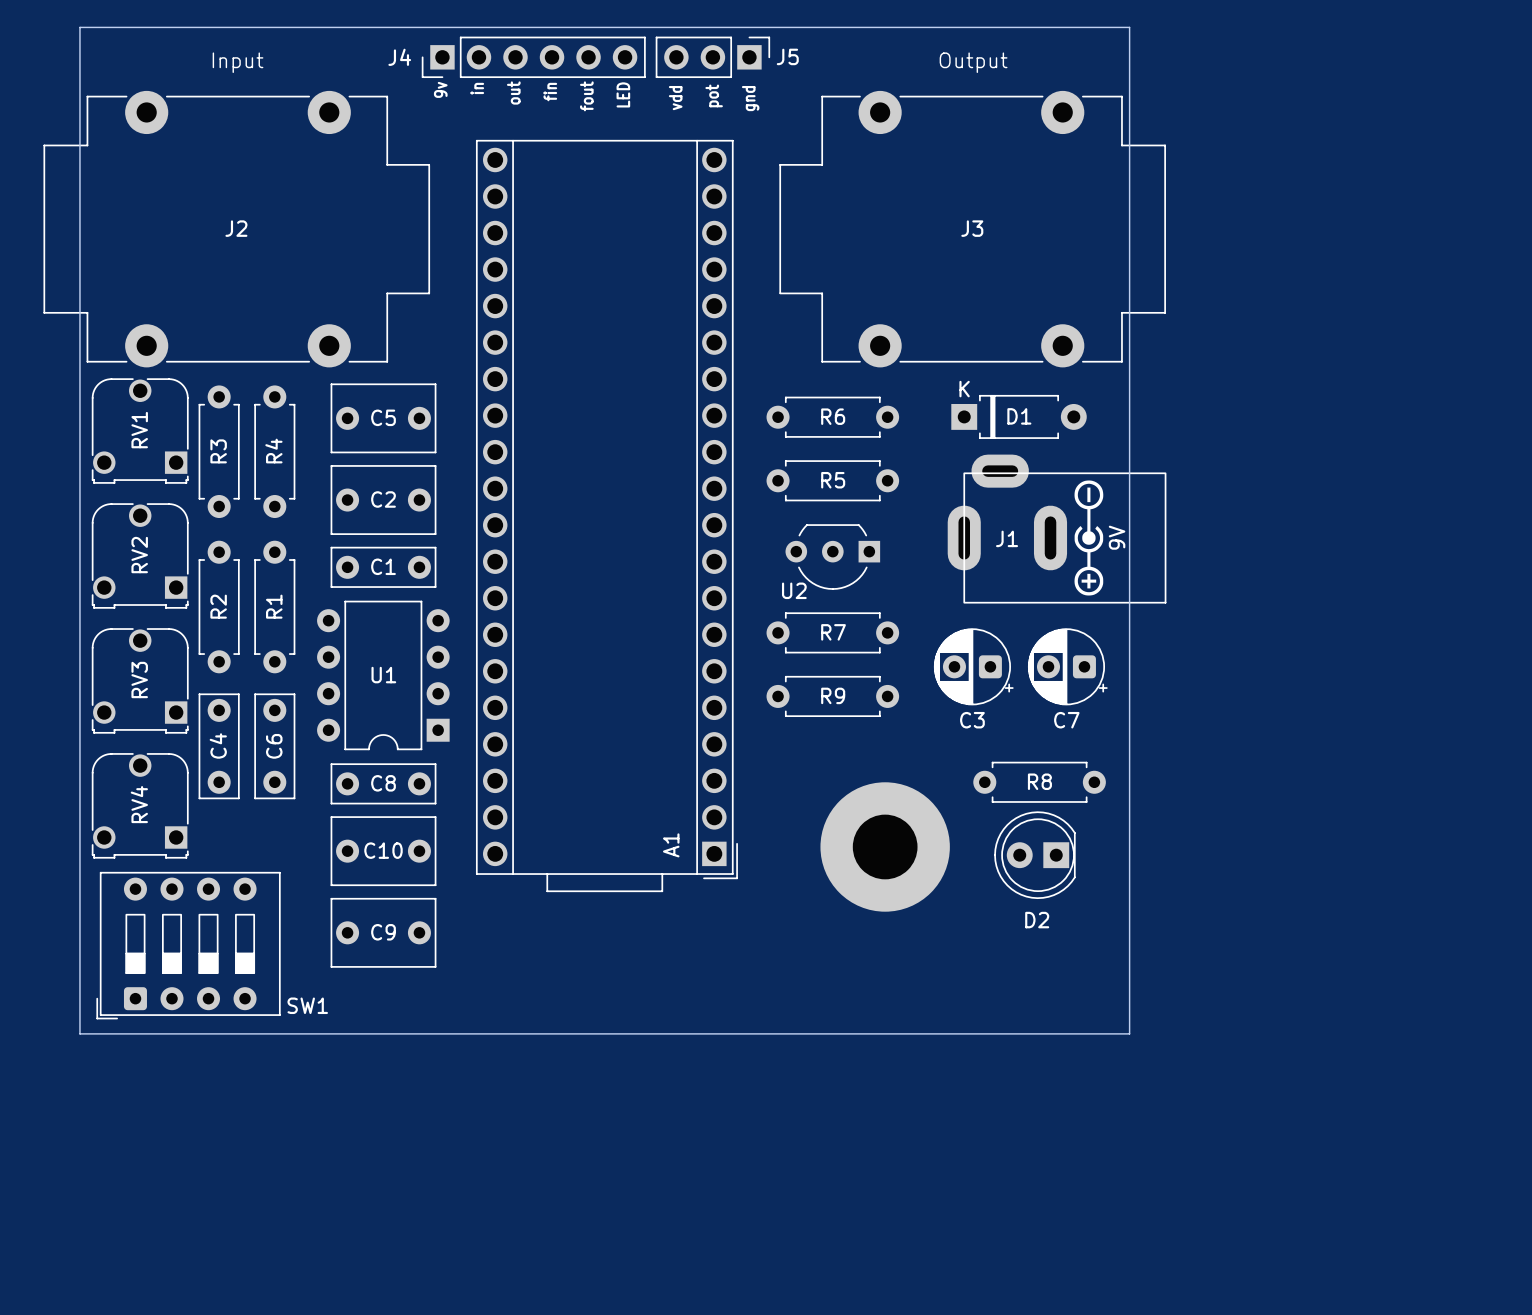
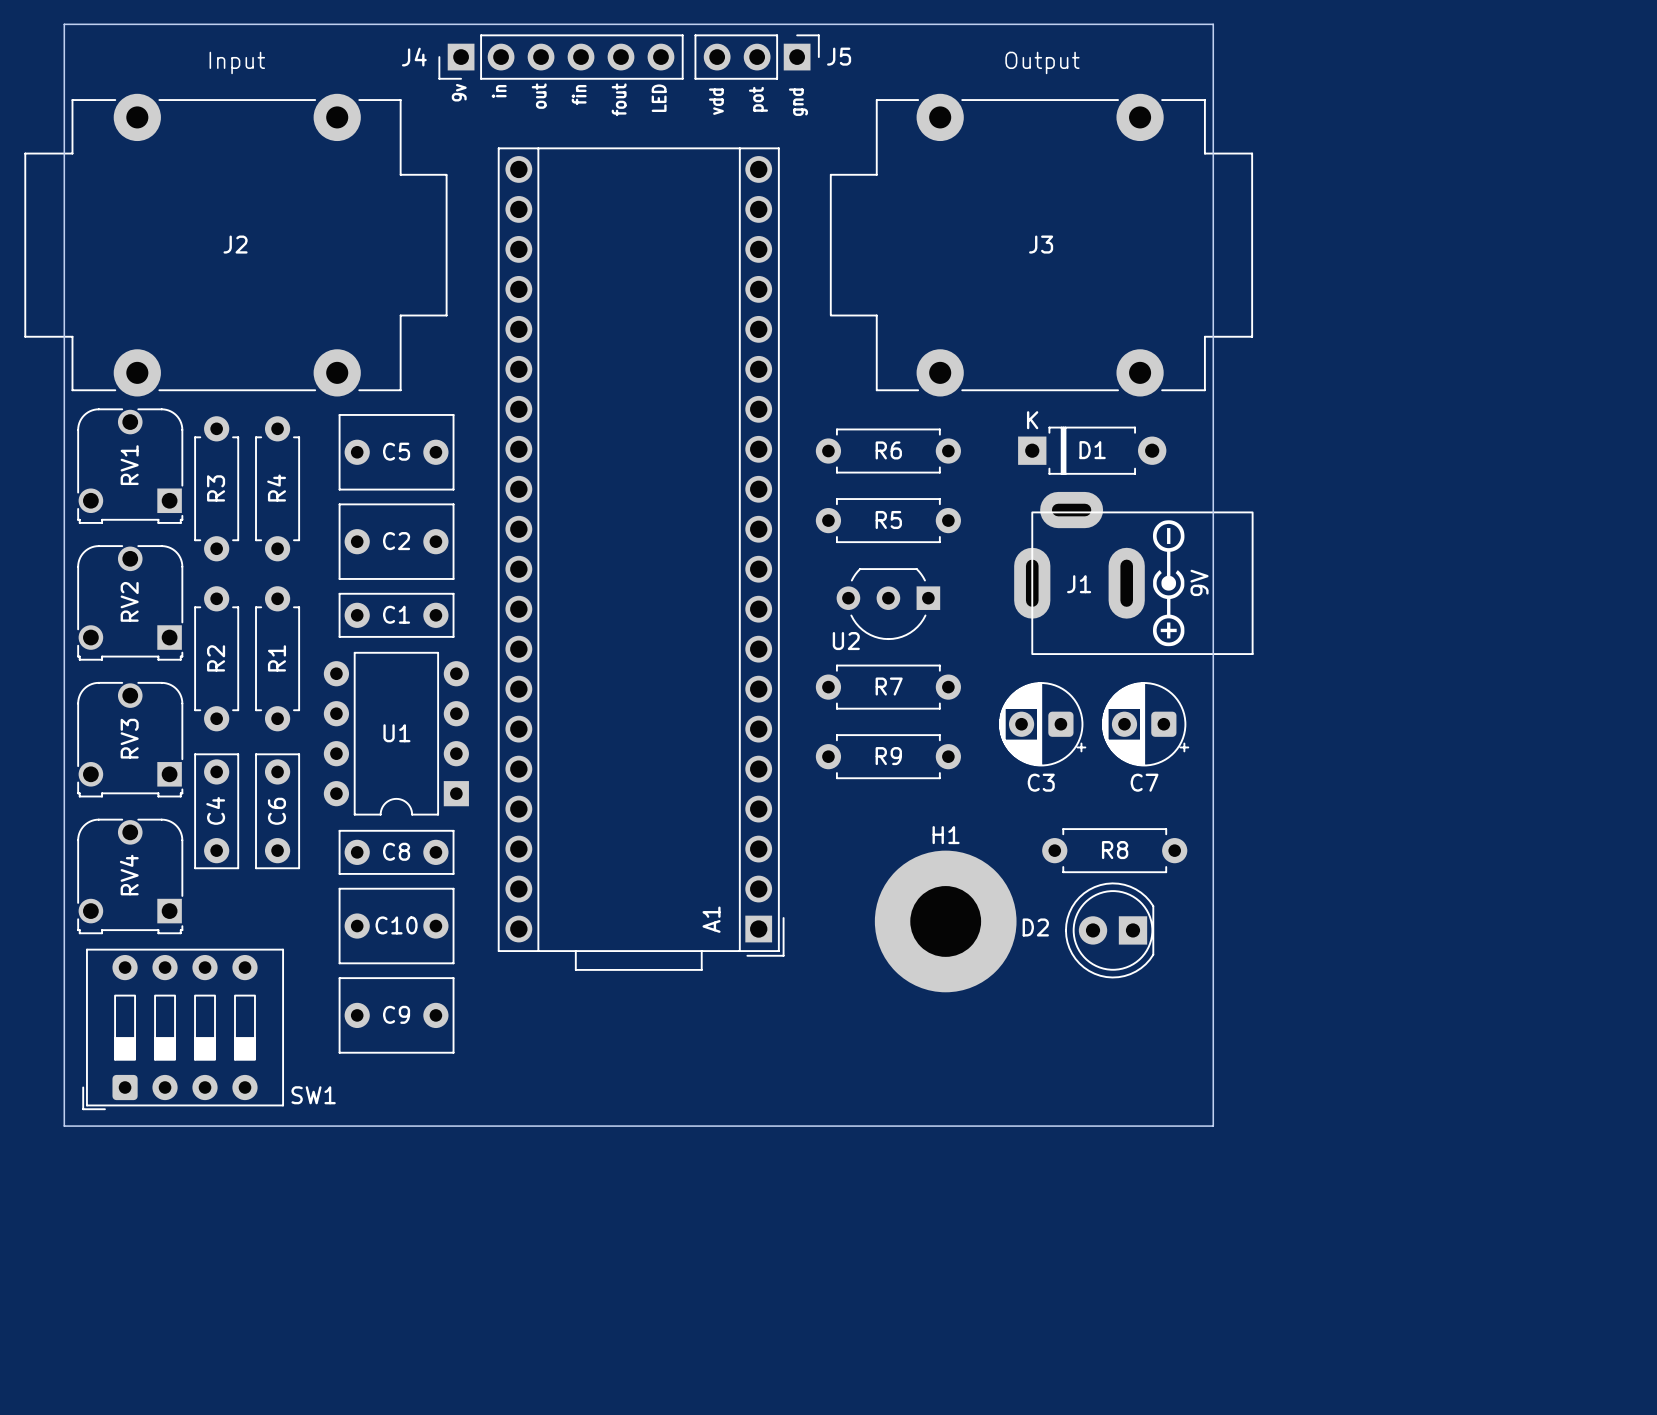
H1 name: none -> H1 (946, 835)
D2 name position: D2 (1037, 920) -> D2 (1035, 927)

